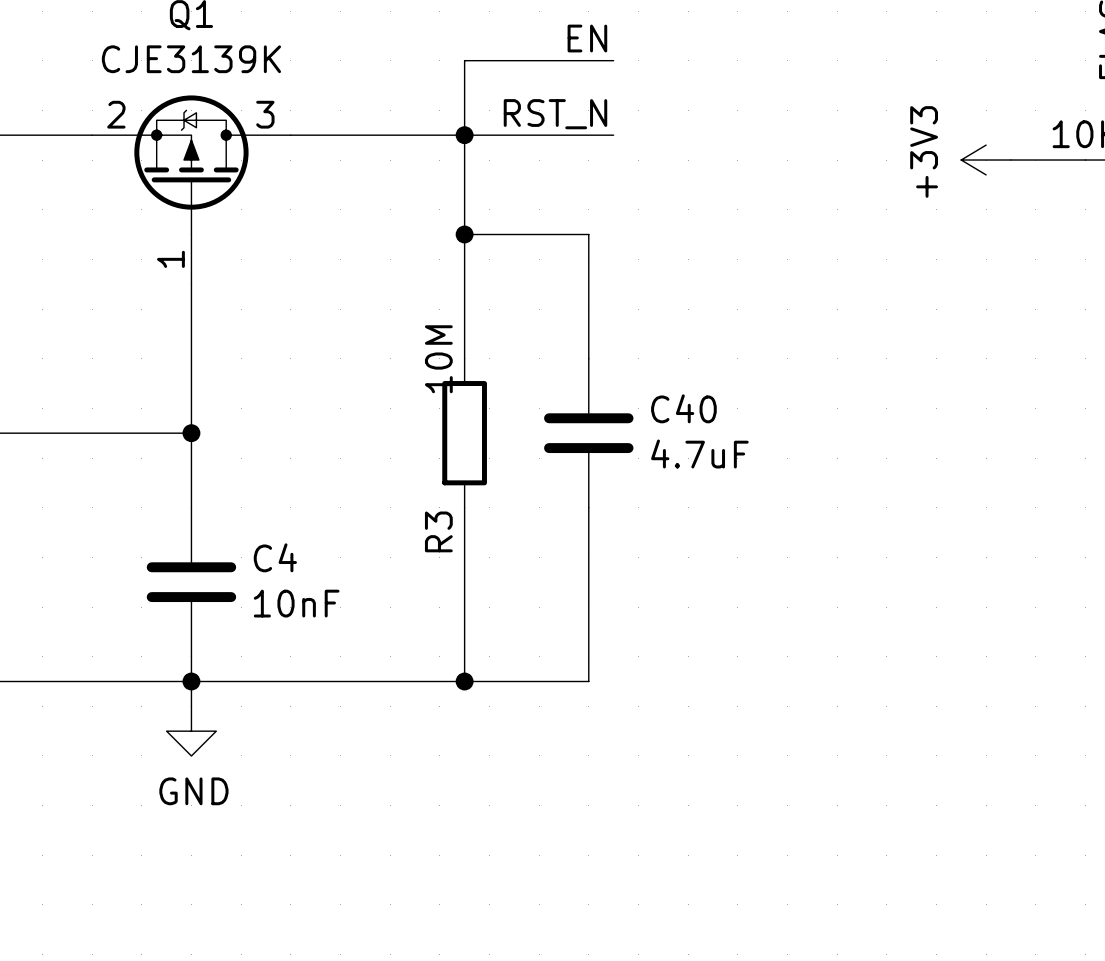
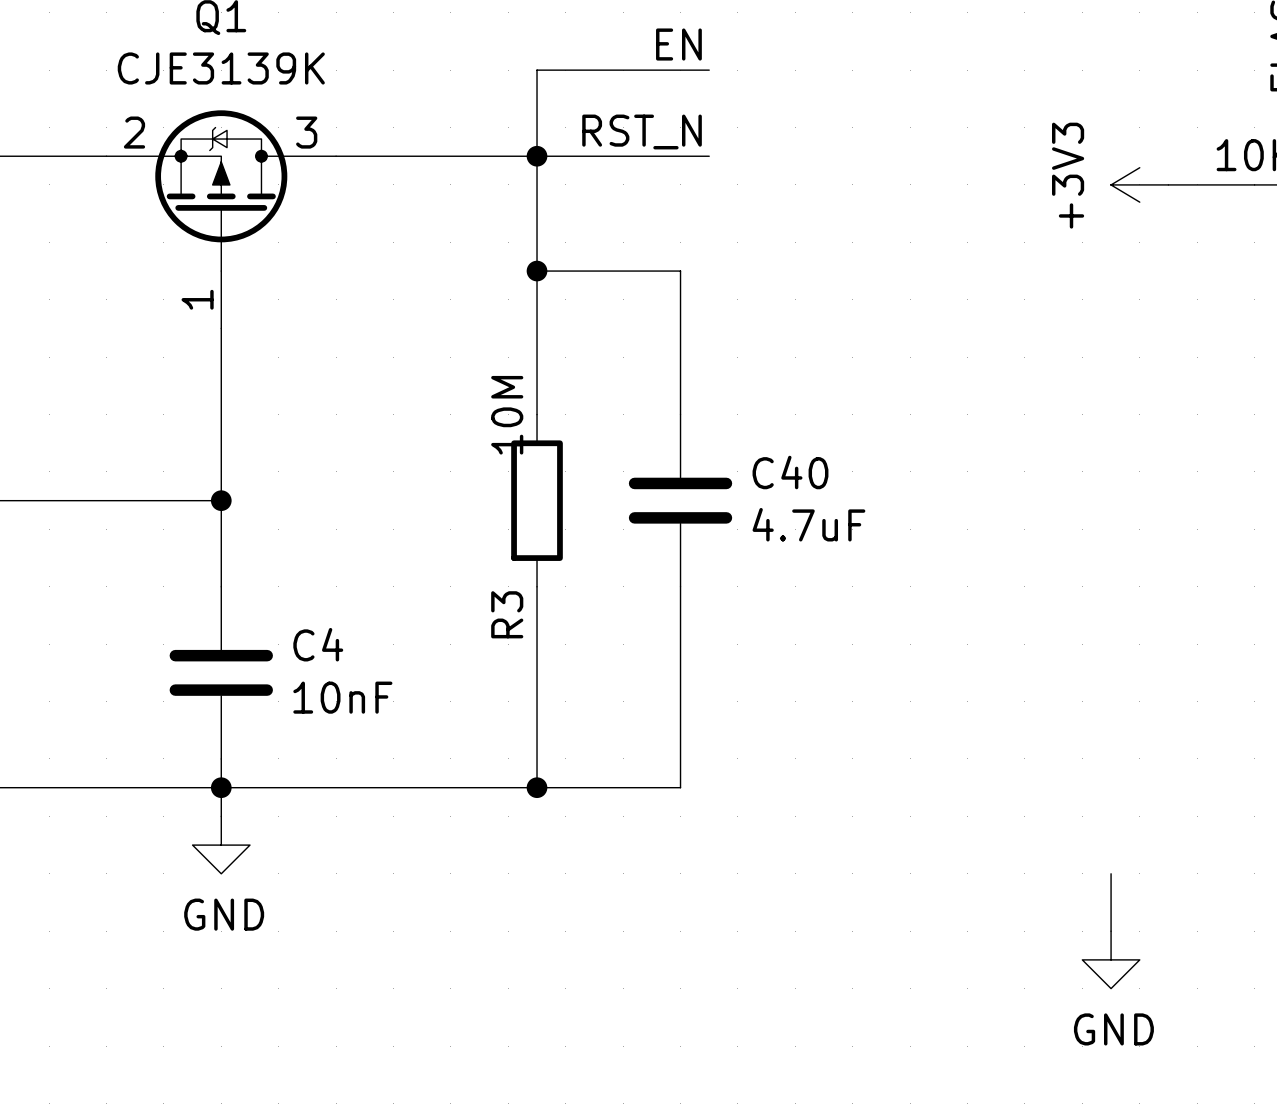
wire: none -> (1111, 873) (1111, 931)
power symbol: none -> GND (1111, 959)

